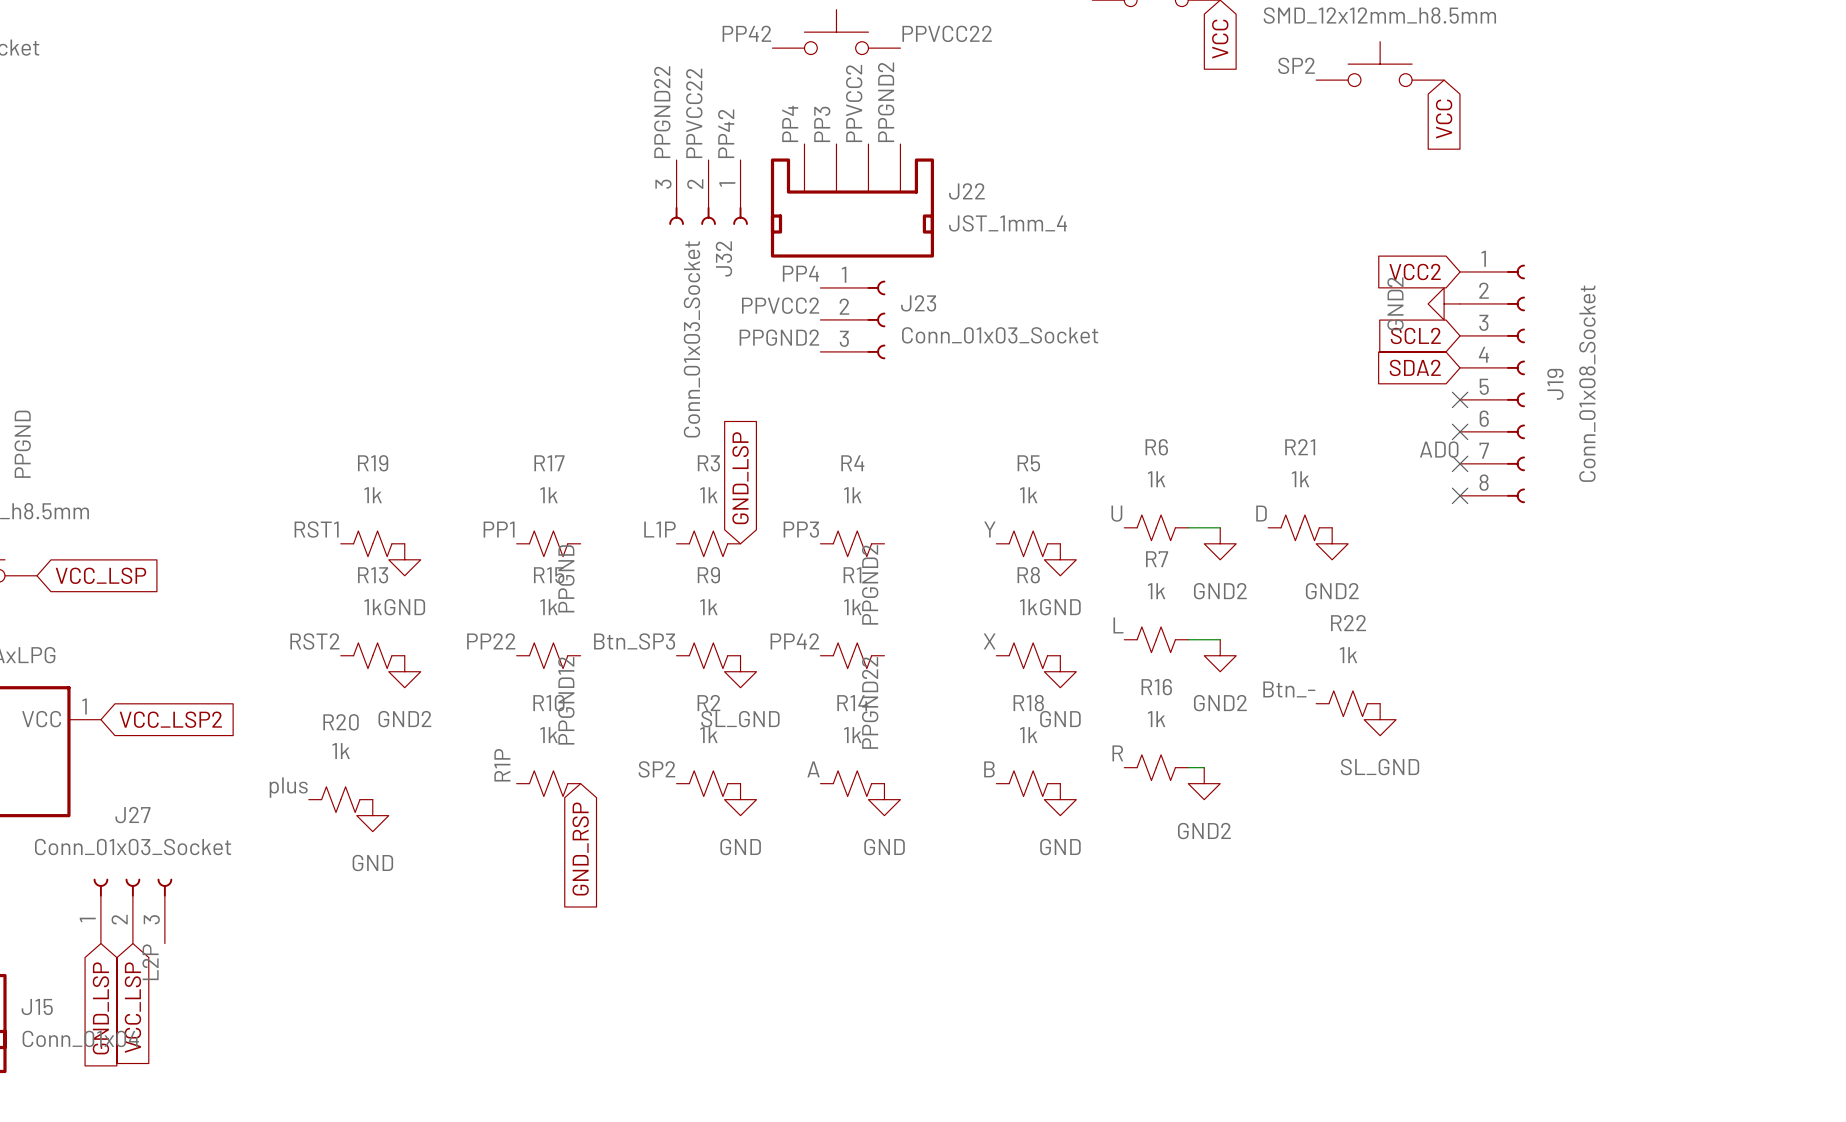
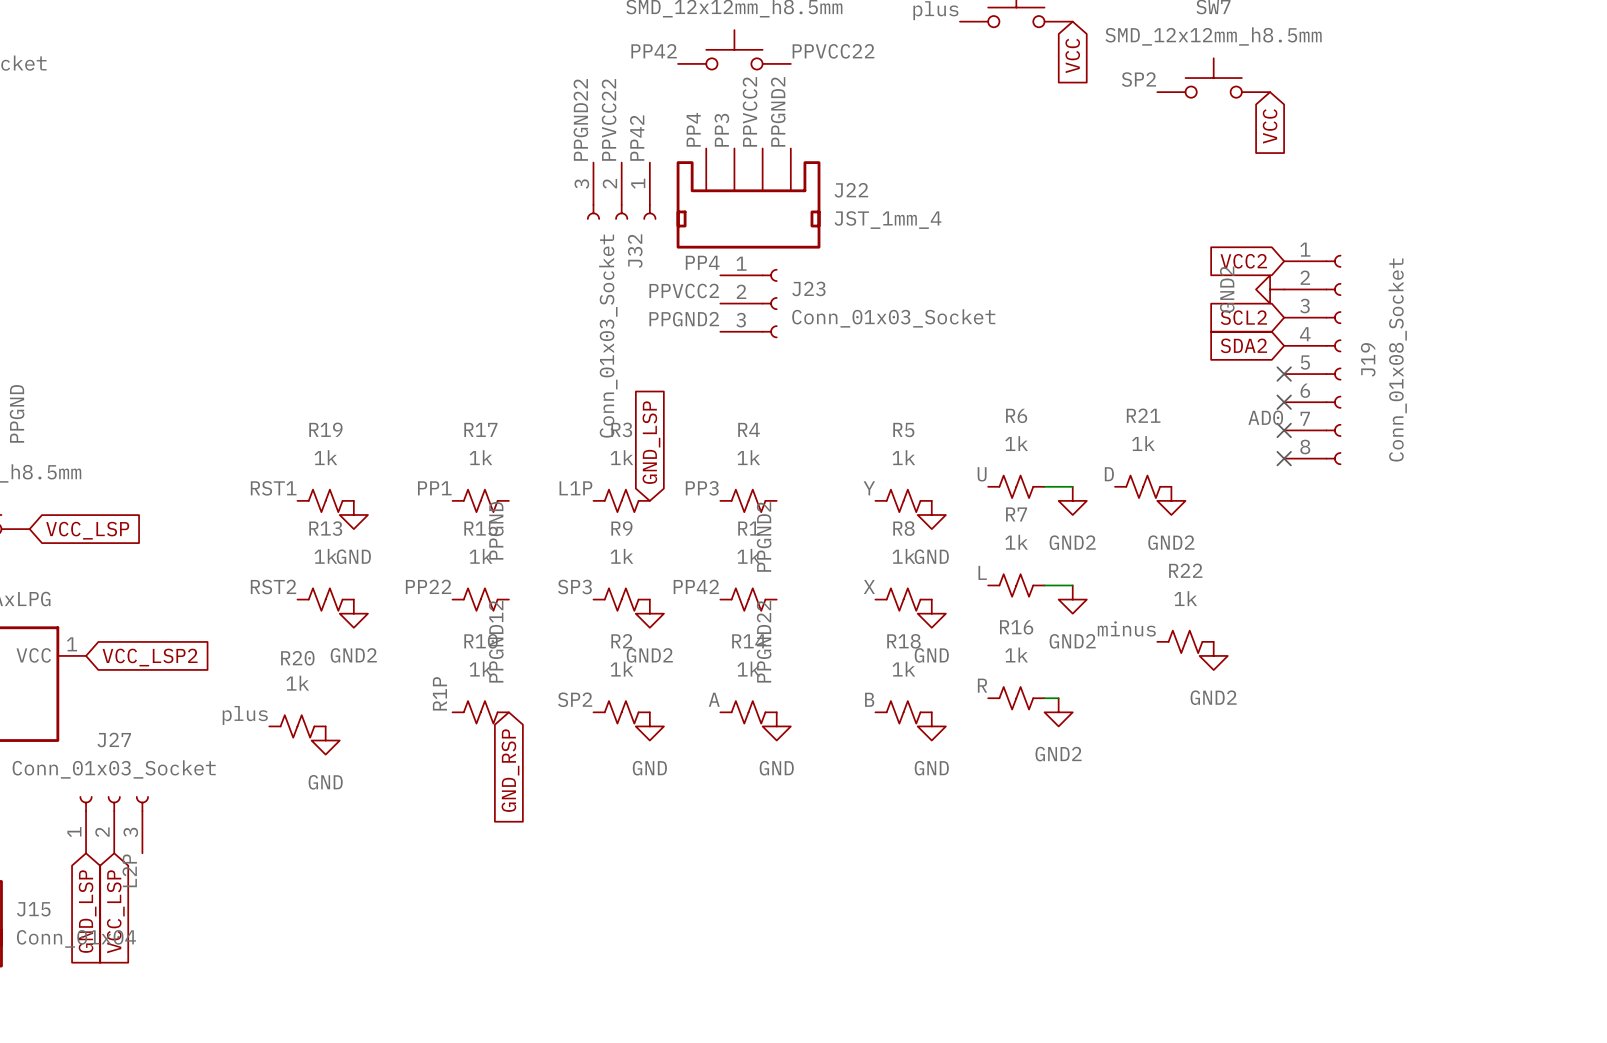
label: Btn_SP3 (634, 641) -> SP3 (574, 586)
power symbol: SL_GND (740, 671) -> GND2 (649, 613)
label: Btn_- (1289, 689) -> minus (1126, 628)
power symbol: SL_GND (1380, 719) -> GND2 (1213, 655)

